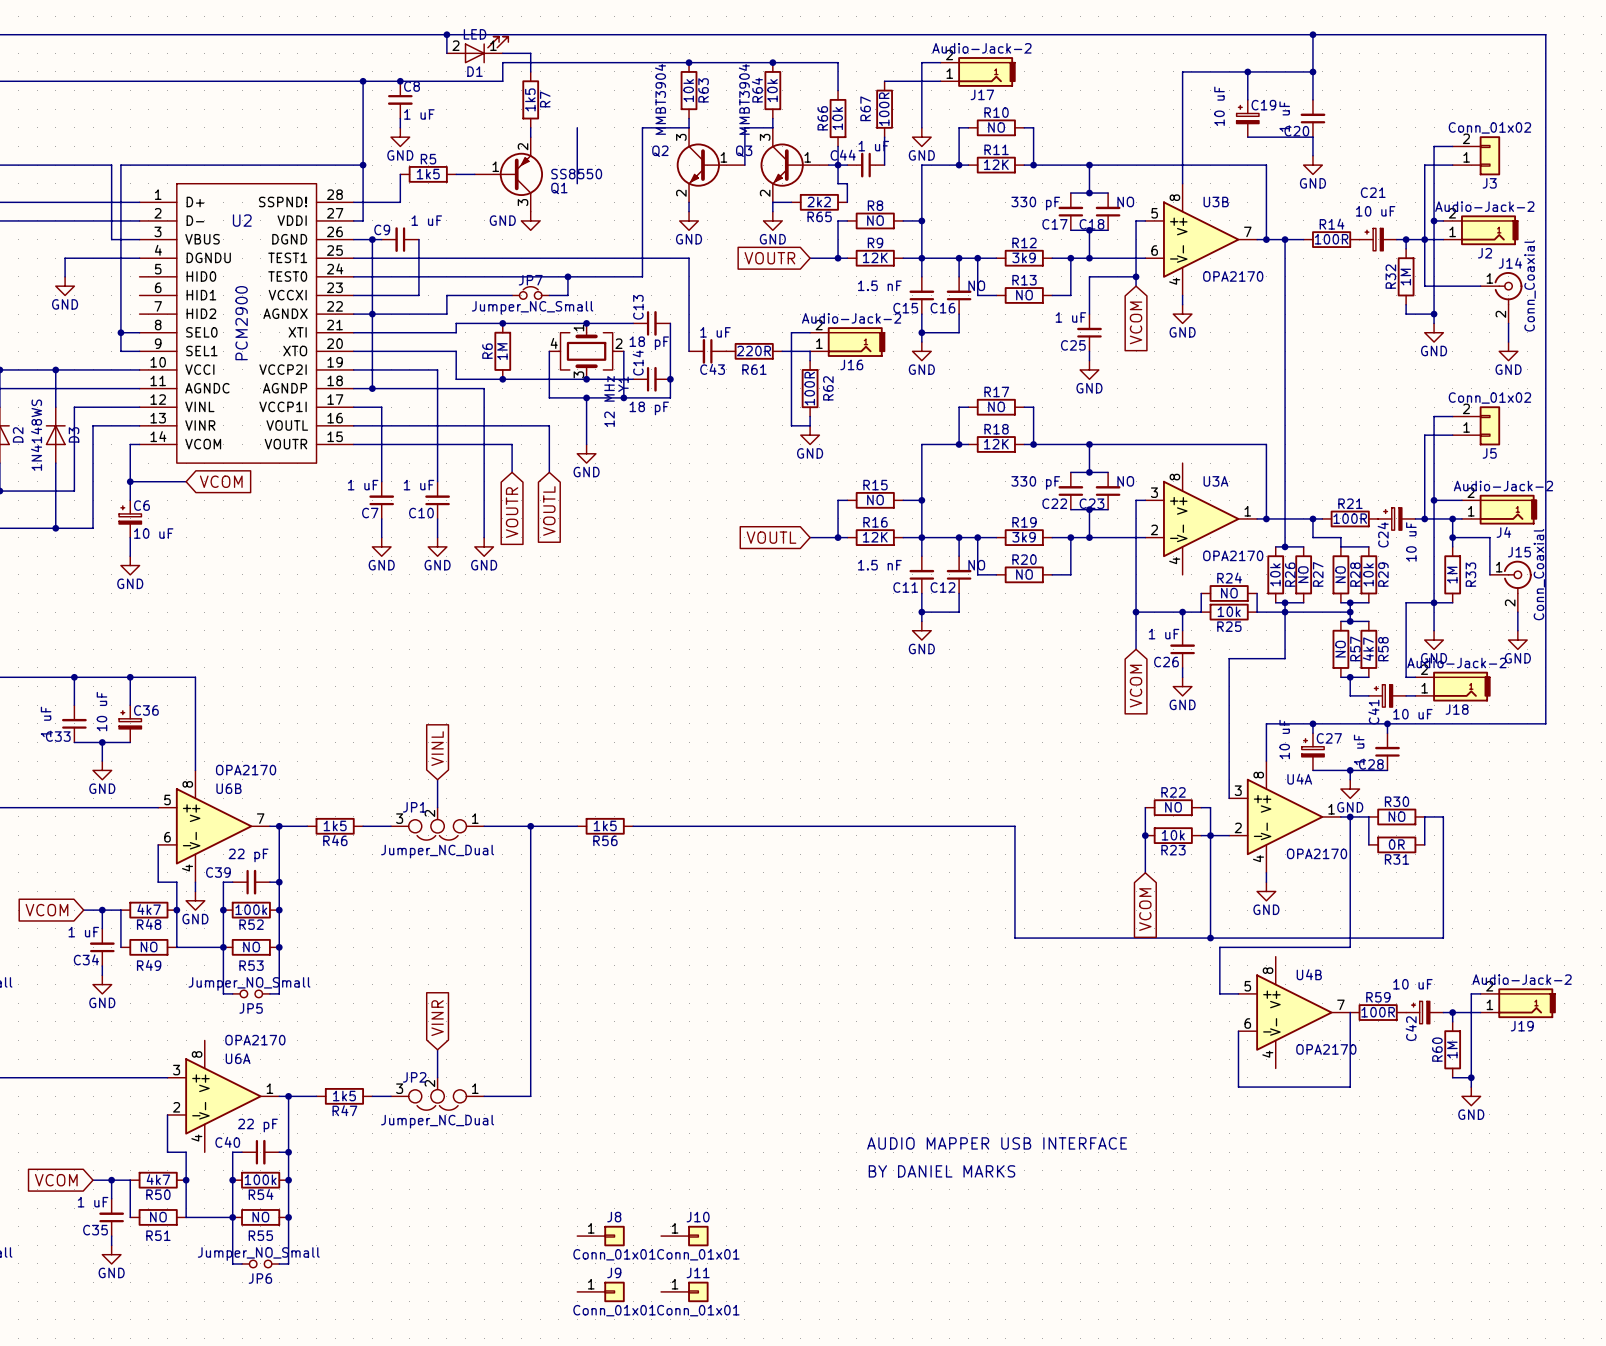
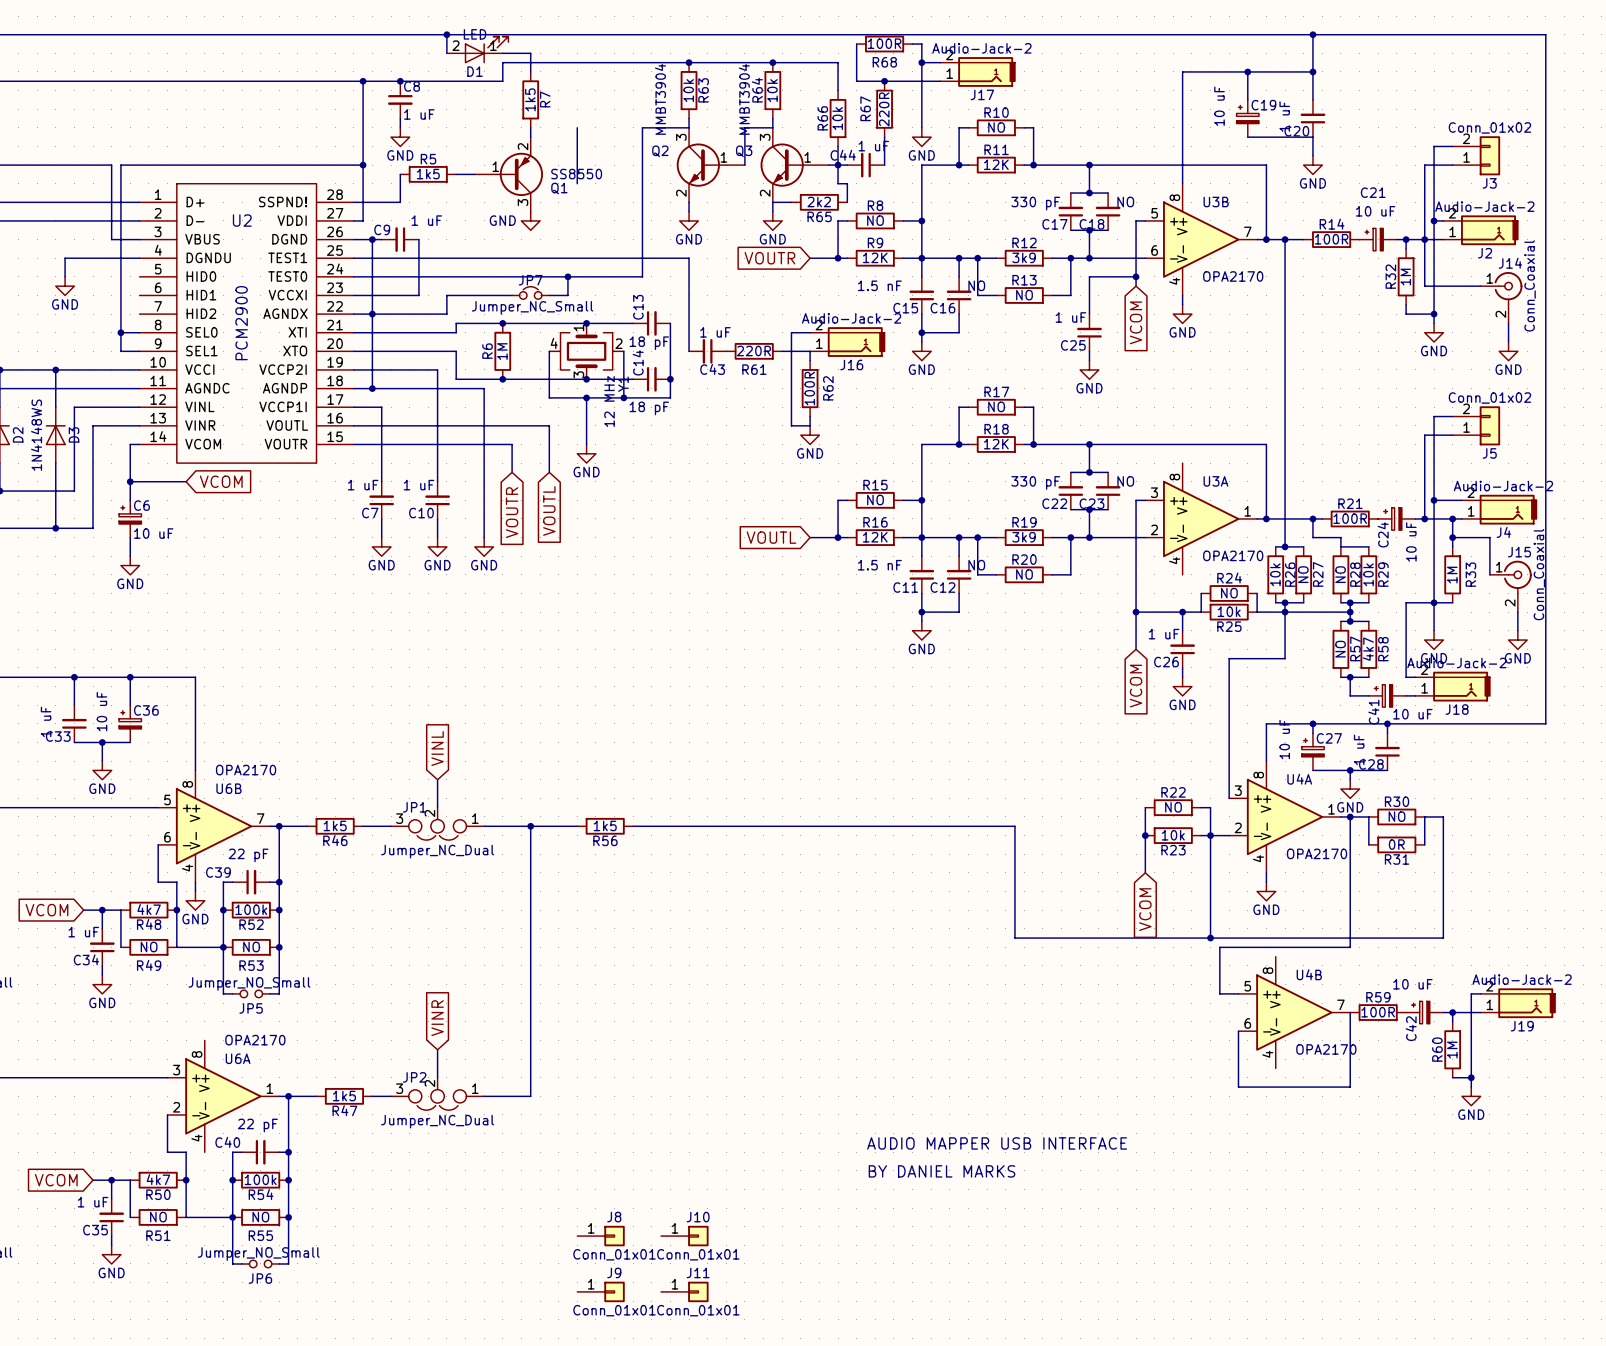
wire: none -> (856, 44) (856, 81) (884, 81)
R68: none -> 100R (884, 44)
wire: none -> (912, 44) (921, 44) (921, 62)
junction: none -> (921, 62)
junction: none -> (884, 81)
R67 value: 100R (884, 109) -> 220R (884, 109)

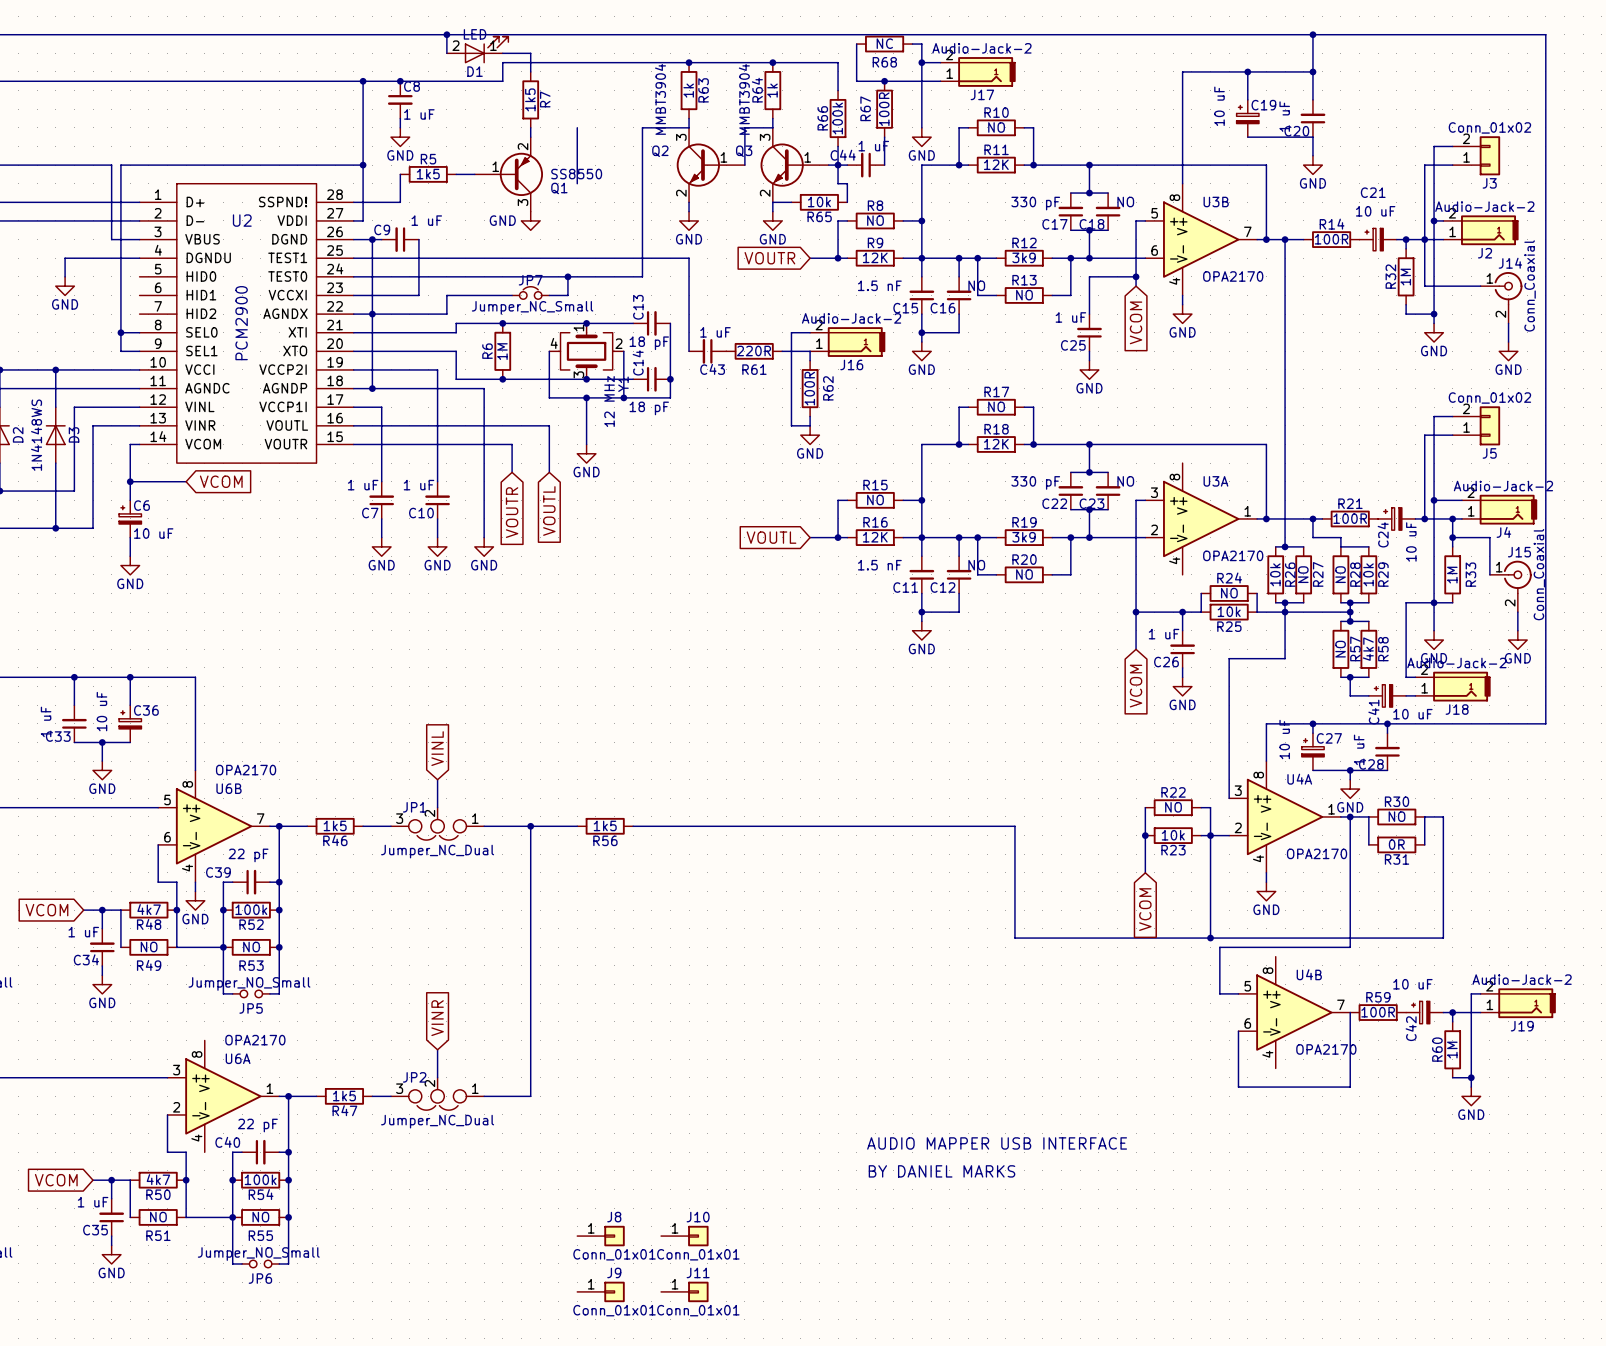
R68 value: 100R (884, 43) -> NC (884, 43)
R63 value: 10k (688, 90) -> 1k (688, 90)
R64 value: 10k (772, 90) -> 1k (772, 90)
R67 value: 220R (884, 109) -> 100R (884, 109)
R66 value: 10k (837, 118) -> 100k (837, 118)
R65 value: 2k2 (819, 201) -> 10k (819, 201)

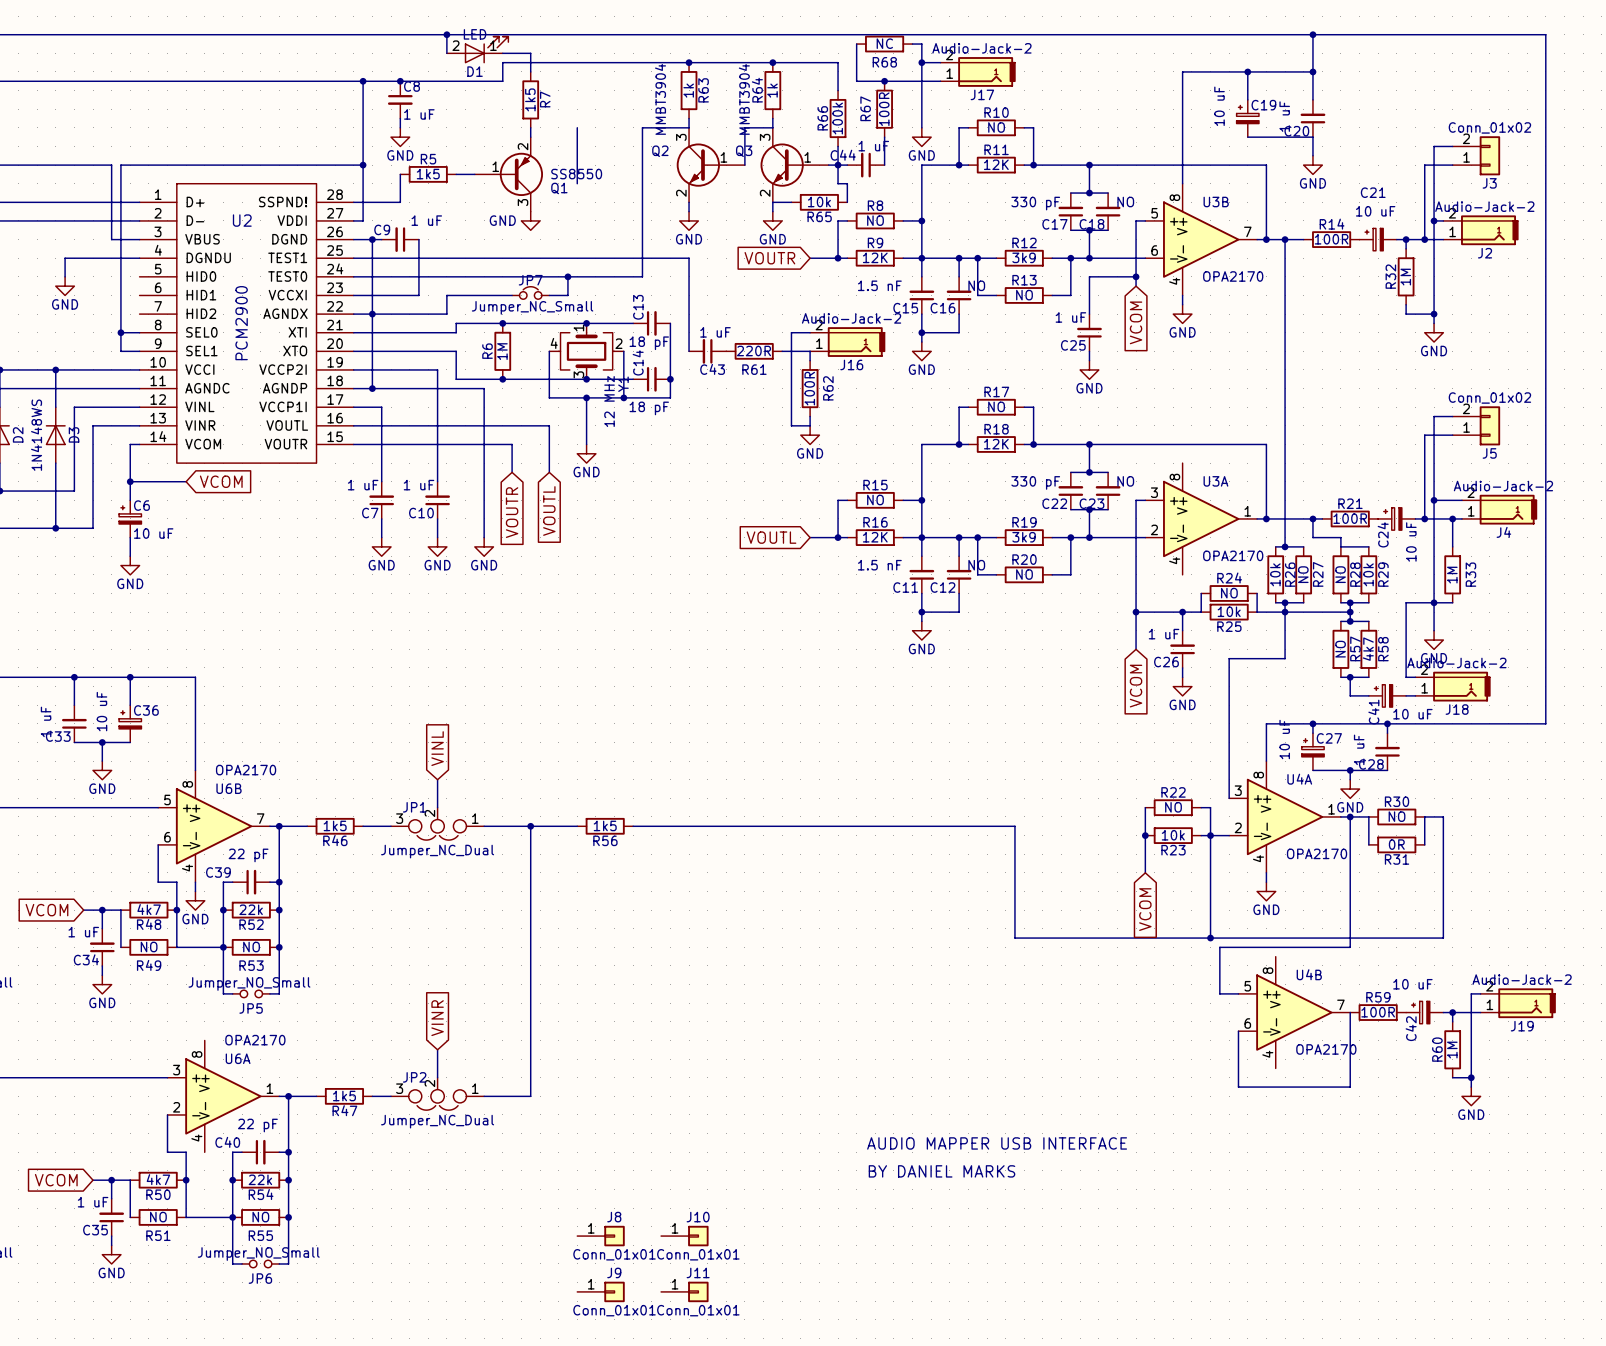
wire: (1424, 239) (1424, 286) (1480, 286) -> none
J14: Conn_Coaxial (1501, 297) -> none
wire: (1508, 323) (1508, 342) -> none
power symbol: GND (1508, 351) -> none
wire: (1452, 537) (1489, 537) (1489, 574) -> none
junction: (1452, 537) -> none
J15: Conn_Coaxial (1510, 586) -> none
wire: (1517, 612) (1517, 630) -> none
power symbol: GND (1517, 640) -> none
R52 value: 100k (251, 909) -> 22k (251, 909)
R54 value: 100k (260, 1179) -> 22k (260, 1179)

